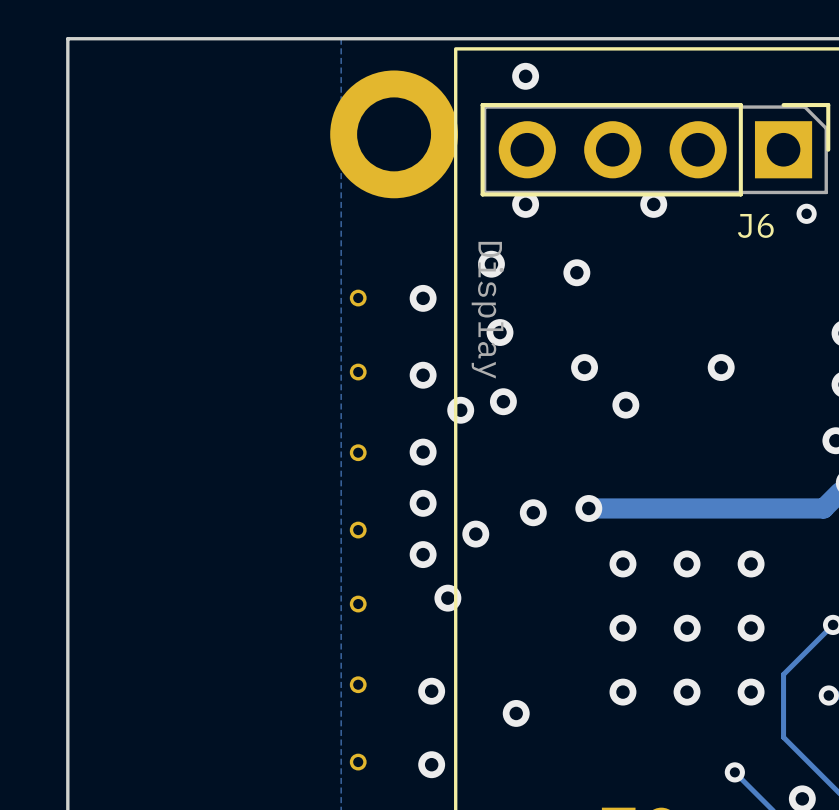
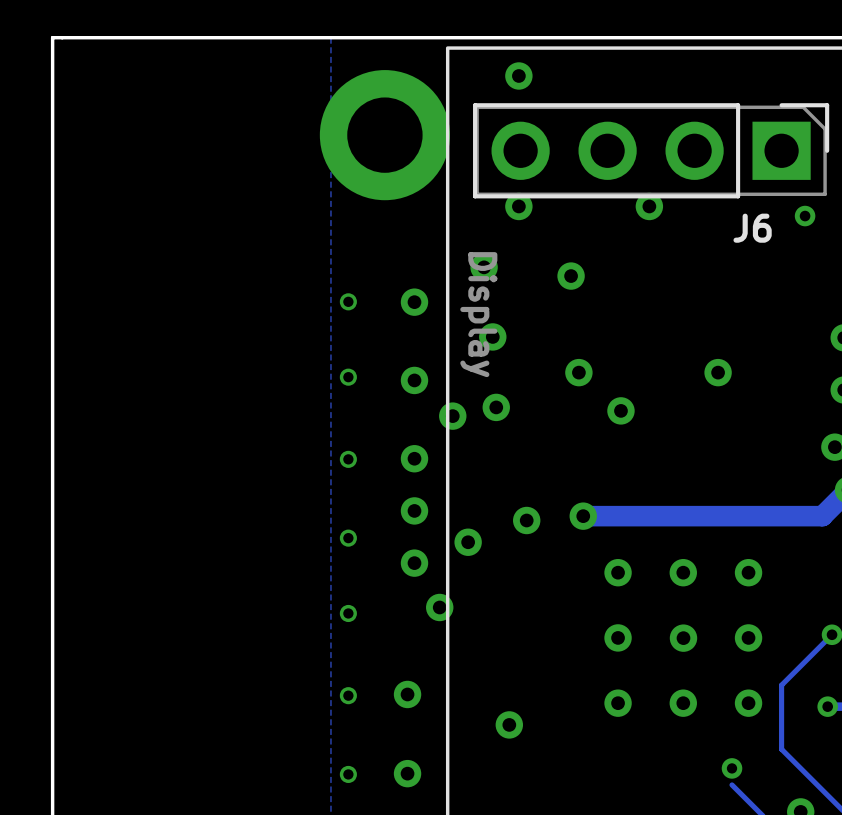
via position: (431, 691) -> (407, 694)
via position: (431, 764) -> (407, 773)
via position: (734, 772) -> (732, 768)

